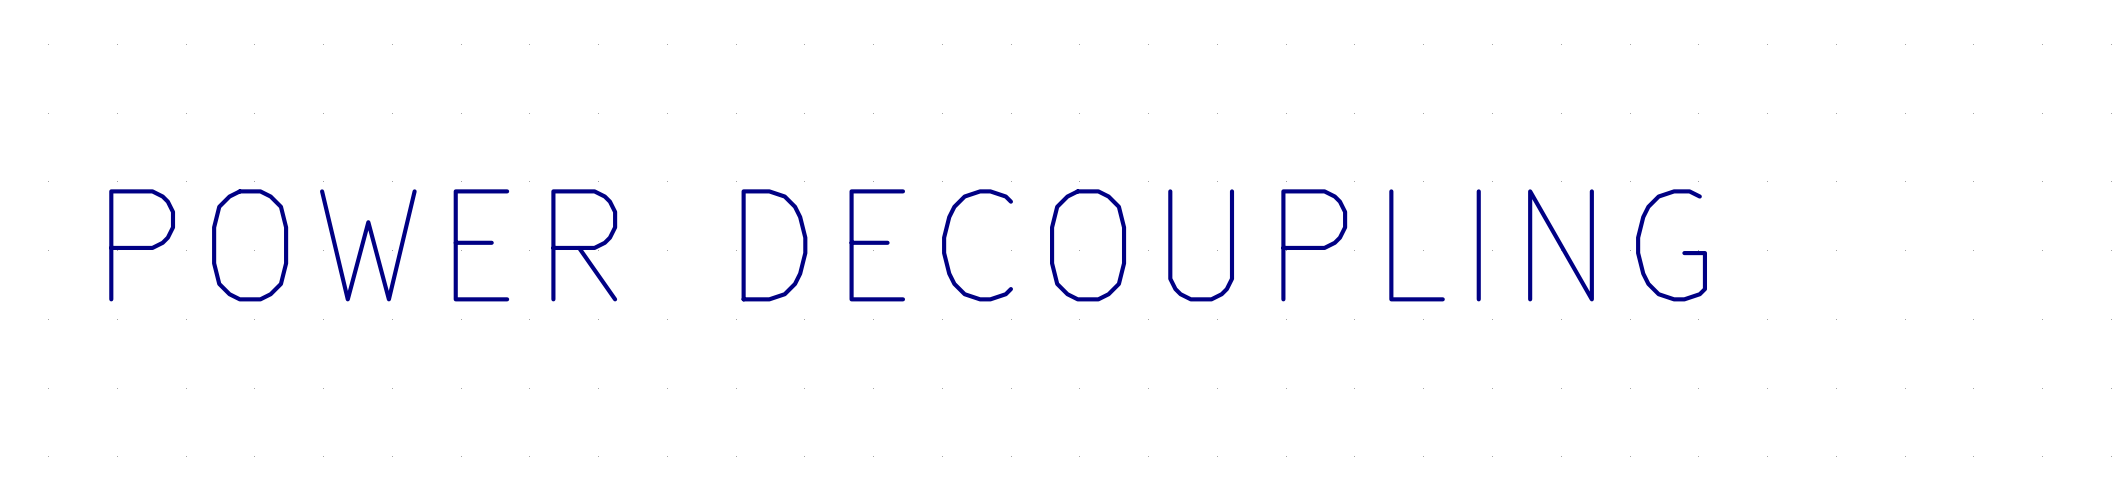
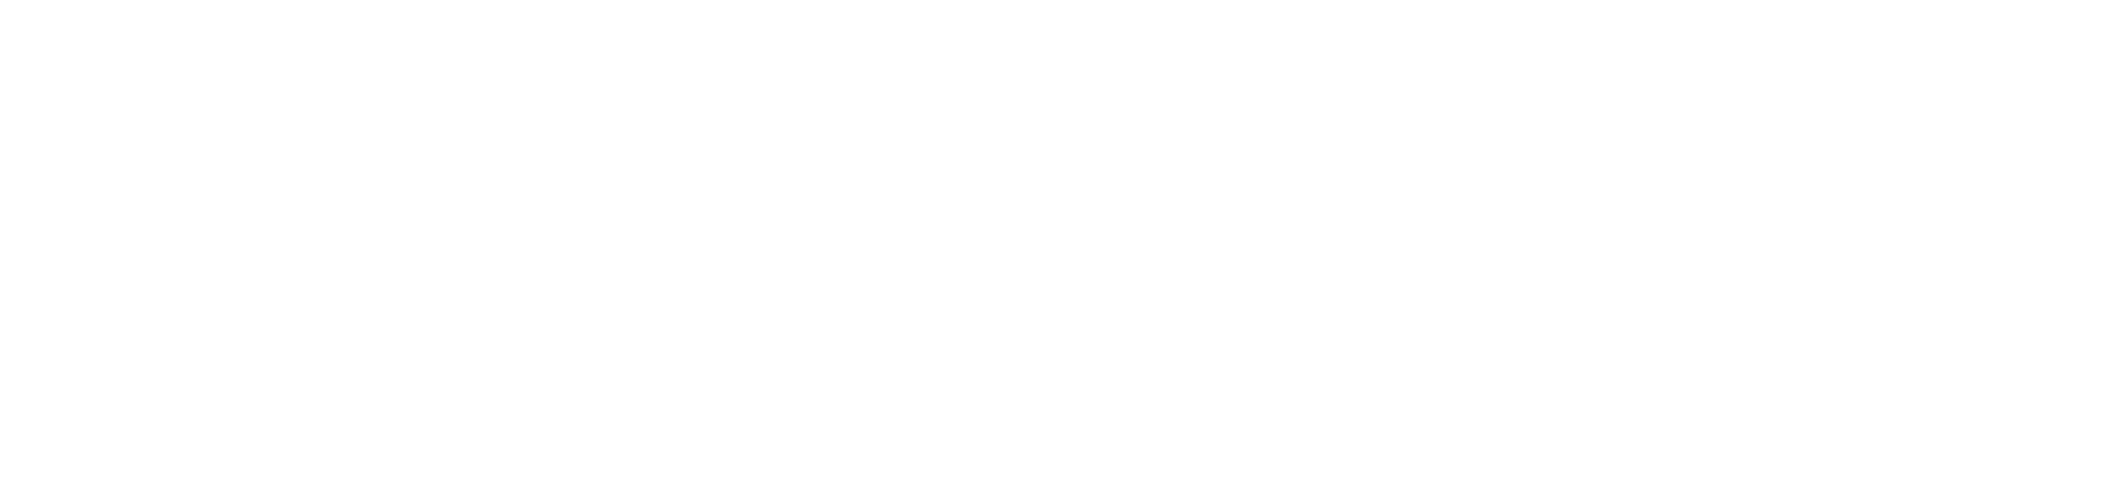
text: POWER DECOUPLING (908, 245) -> none

